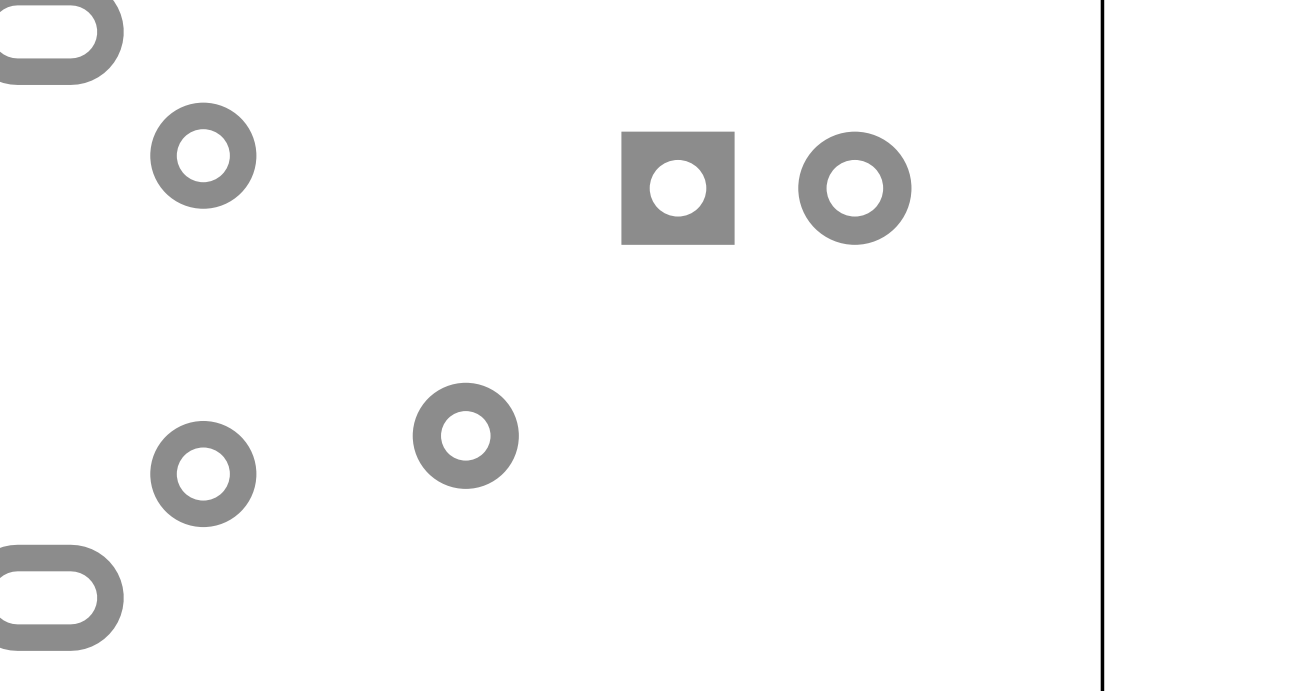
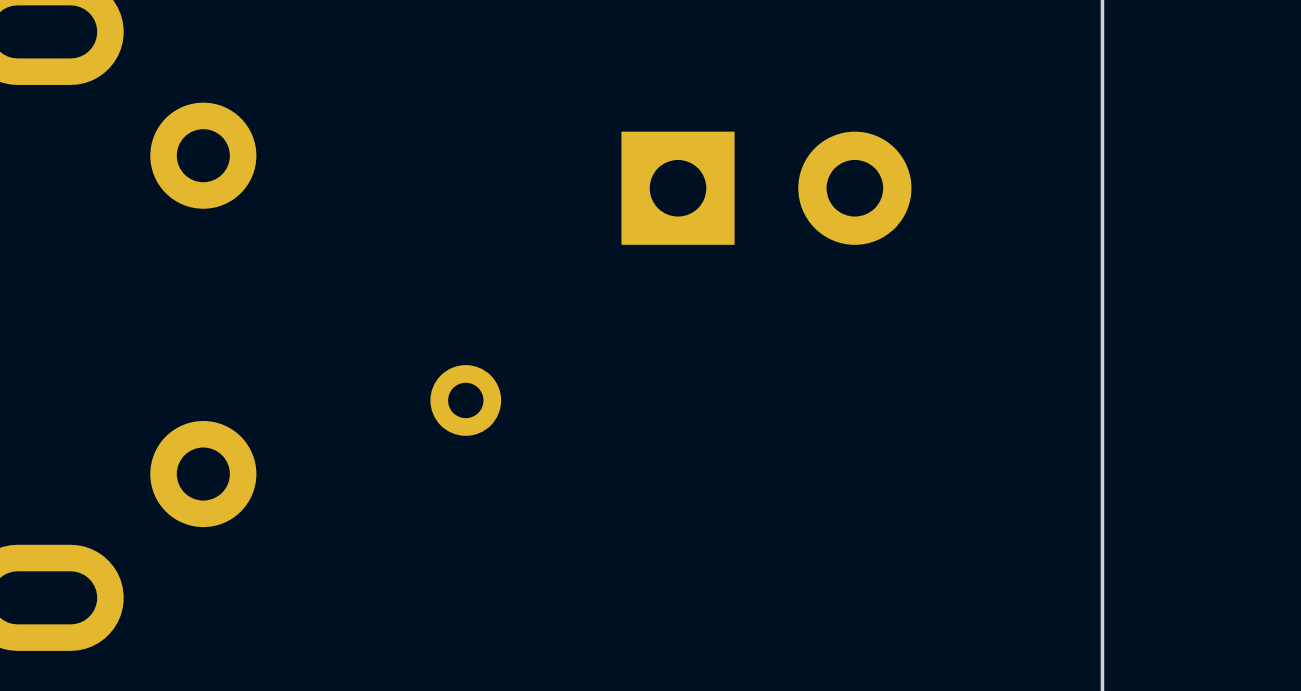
part footprint: [412, 382, 519, 489] -> [430, 365, 502, 436]

